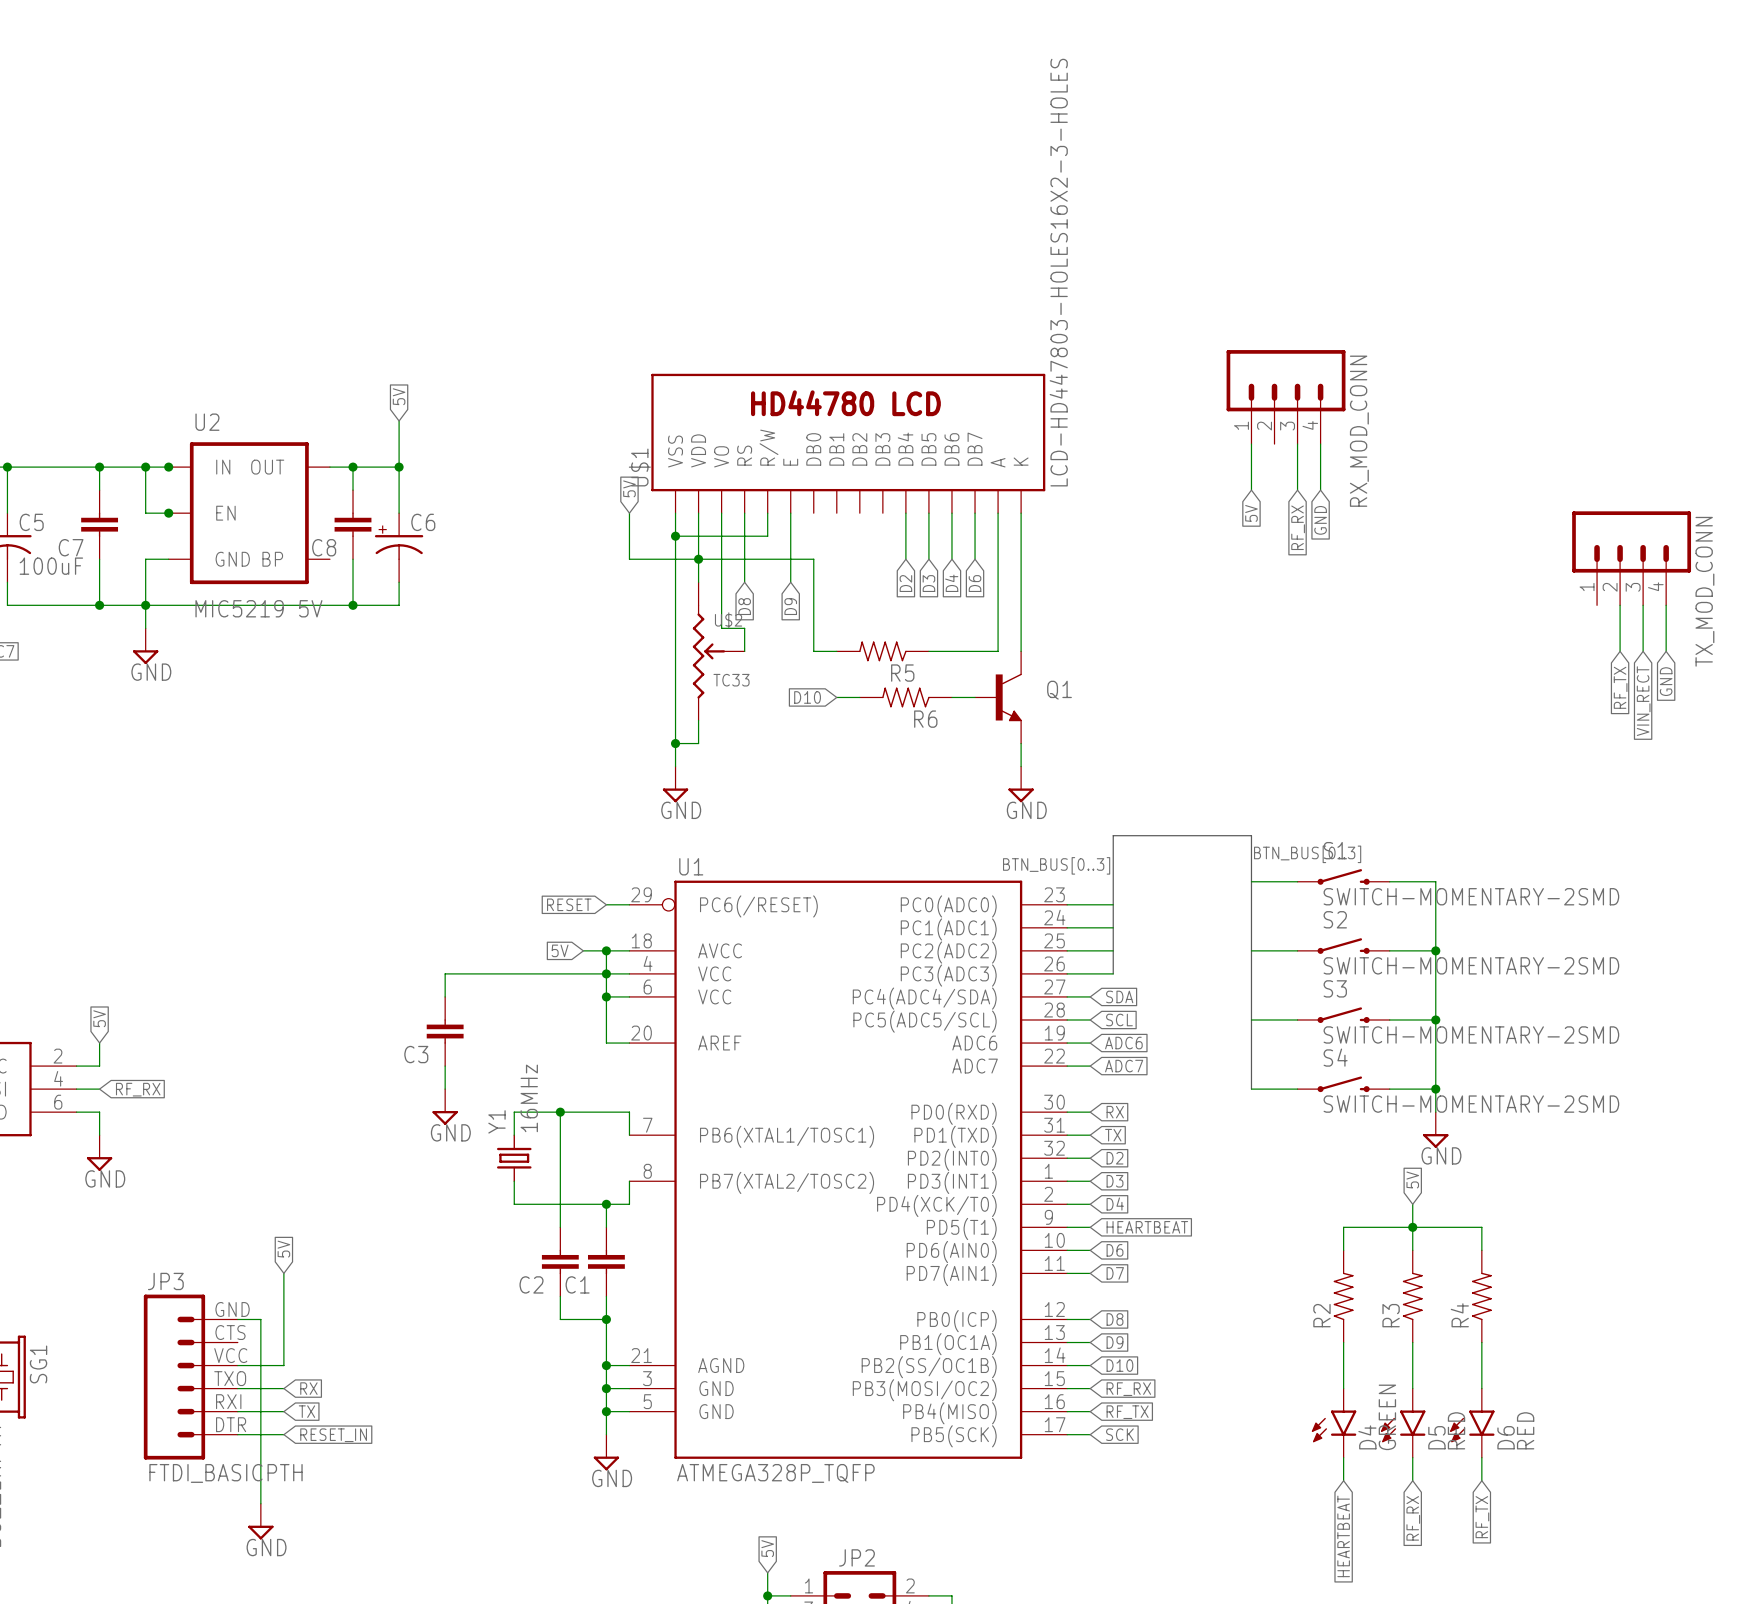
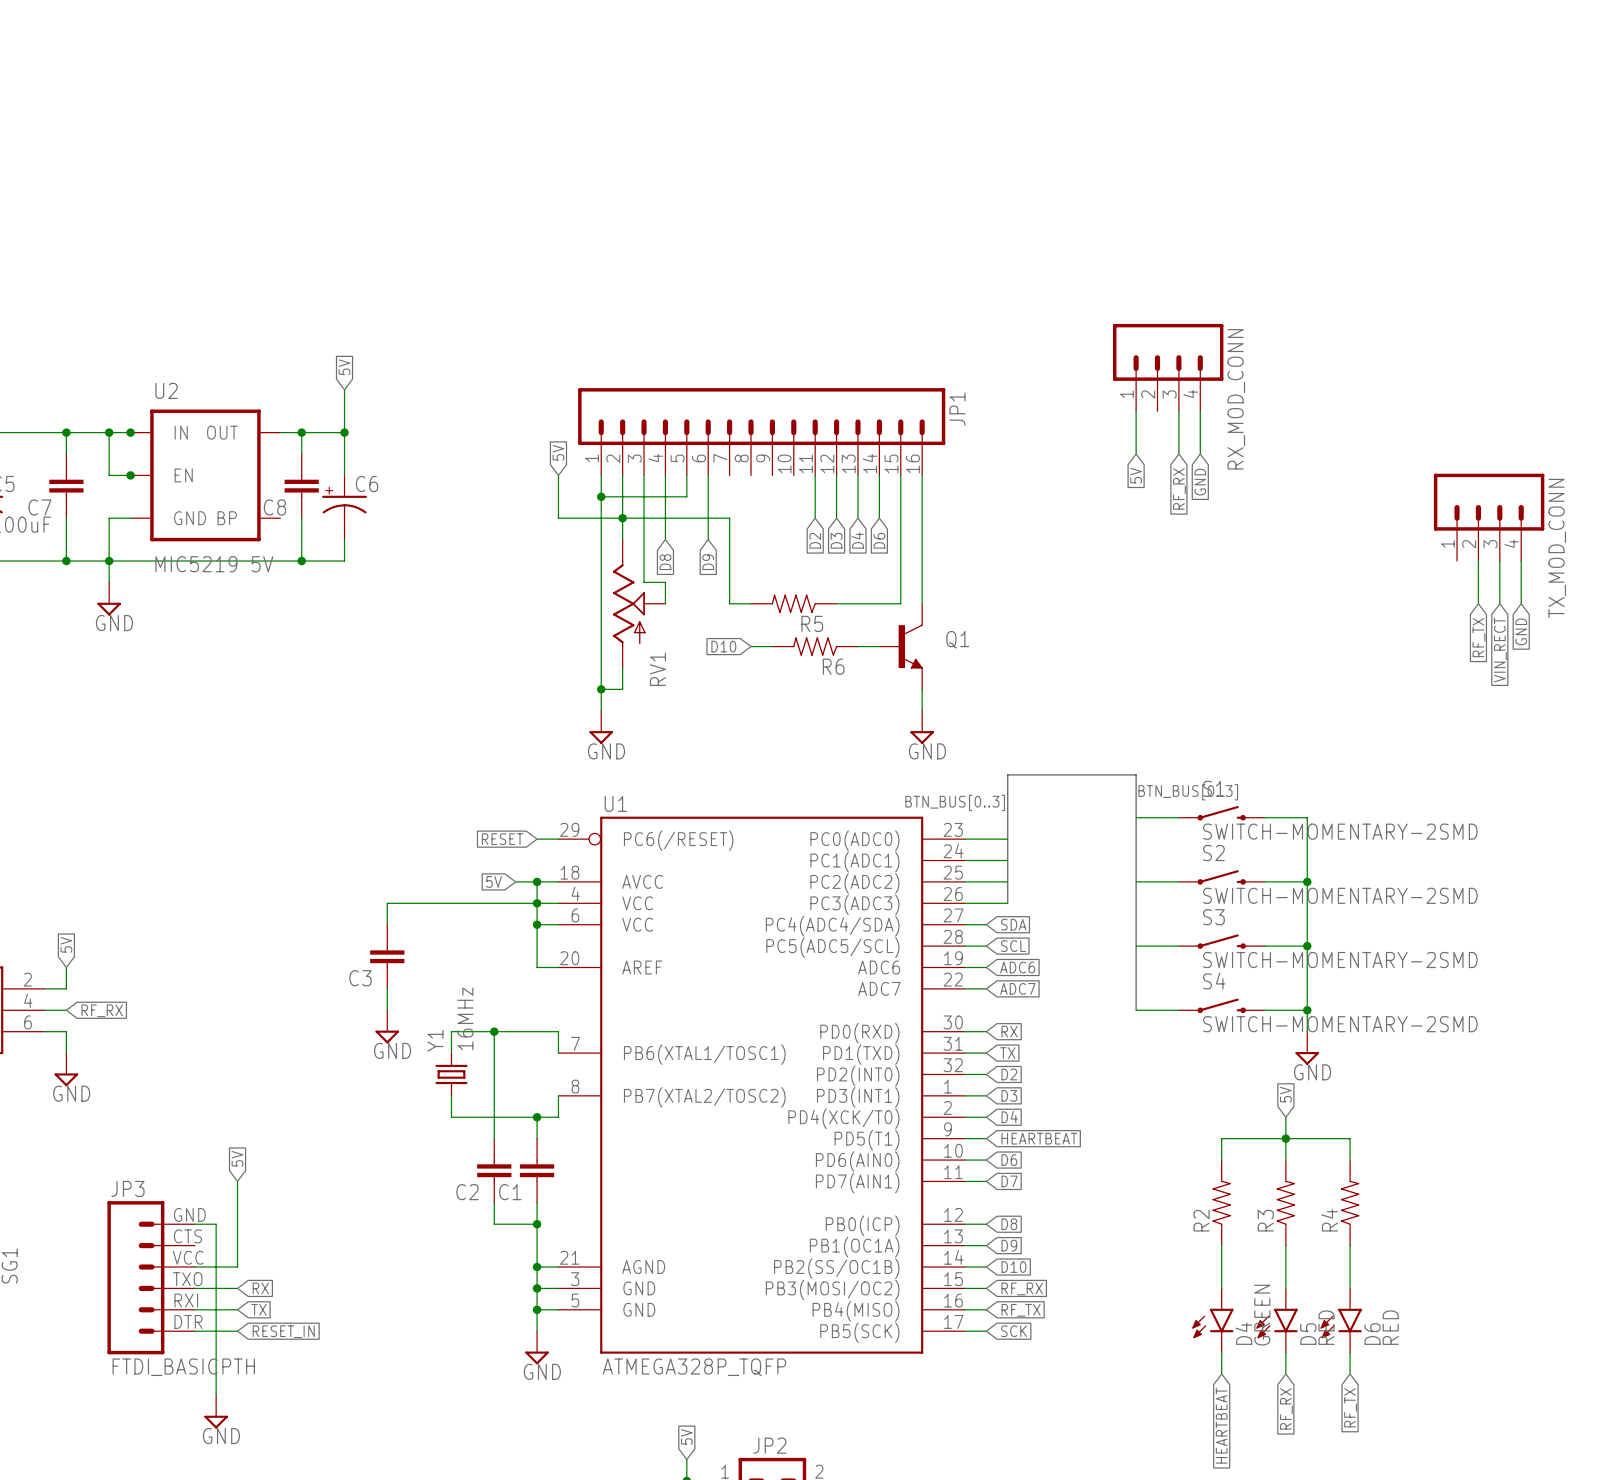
U$1: LCD-HD447803-HOLES16X2-3-HOLES (848, 443) -> none
JP1: none -> (761, 431)
RV1: none -> (639, 603)
U$2: TC33 (718, 651) -> none

